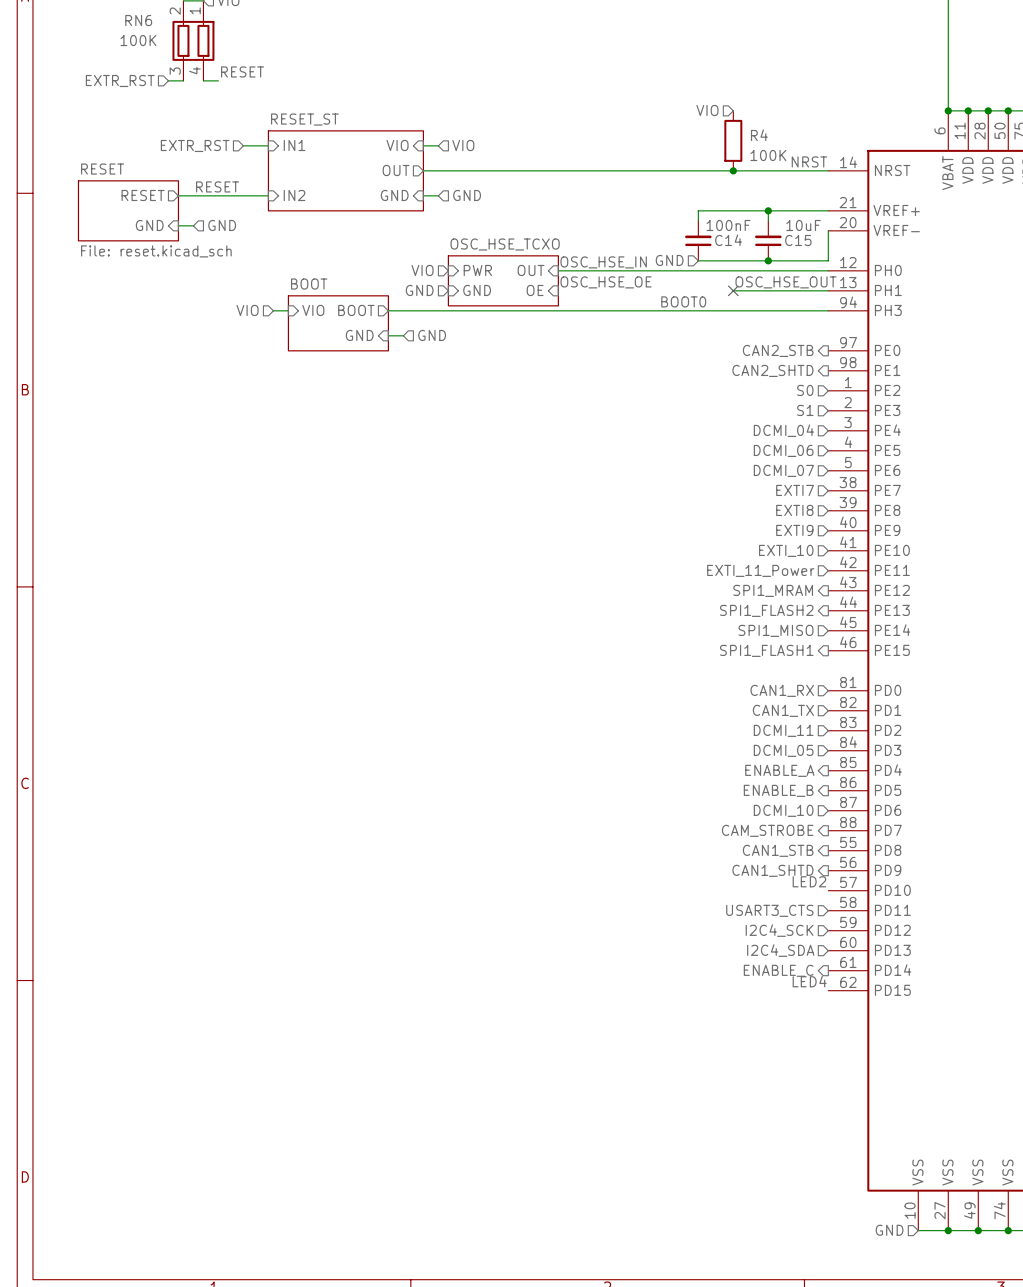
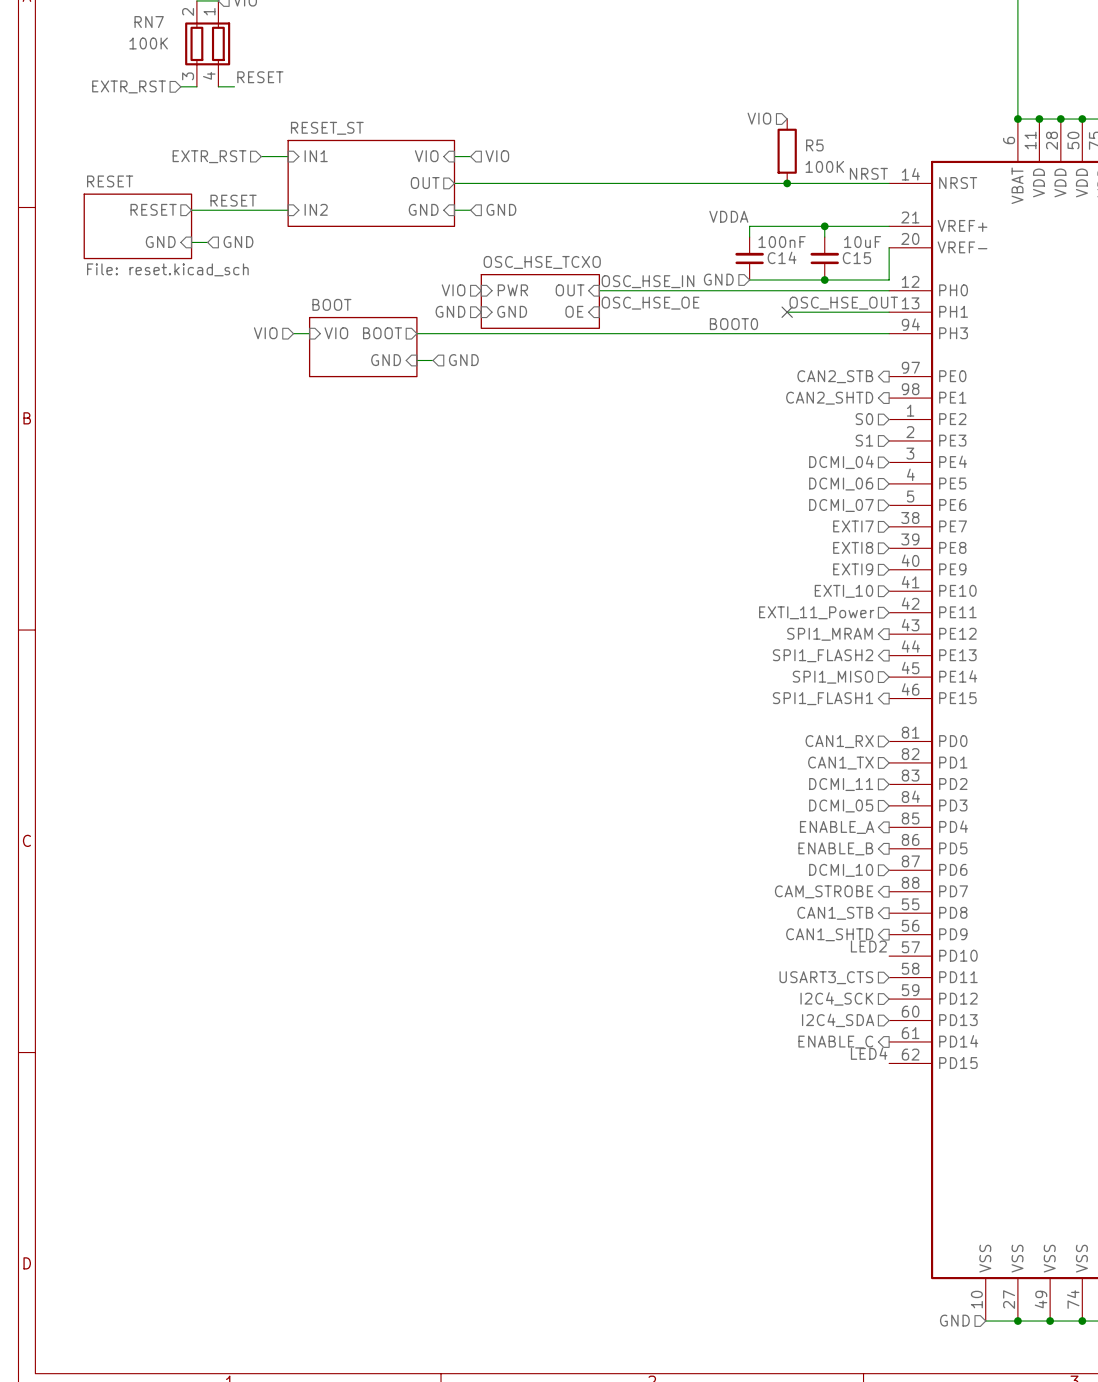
RN6 name: RN6 (138, 20) -> RN7 (149, 22)
R4 name: R4 (759, 135) -> R5 (814, 145)
label: none -> VDDA (728, 216)

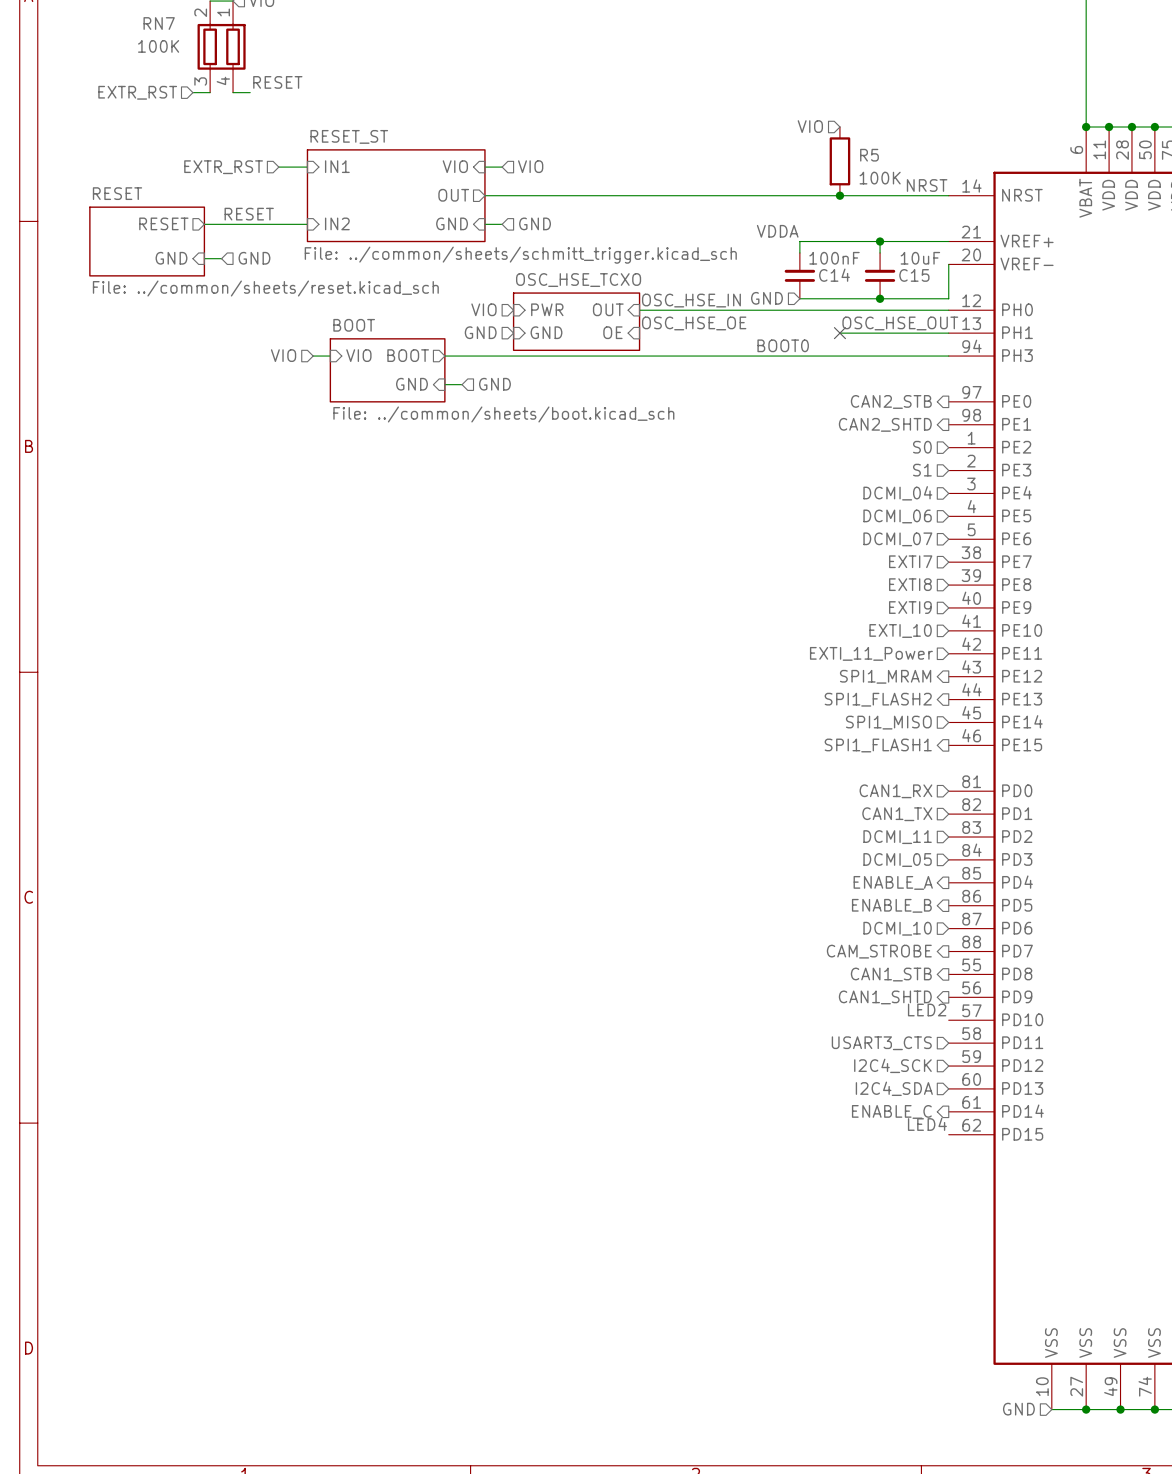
sheet RESET_ST value: none -> File: ../common/sheets/schmitt_trigger.kicad_sch (520, 255)
sheet RESET value: File: reset.kicad_sch (167, 269) -> File: ../common/sheets/reset.kicad_sch (265, 288)
sheet BOOT value: none -> File: ../common/sheets/boot.kicad_sch (503, 414)

